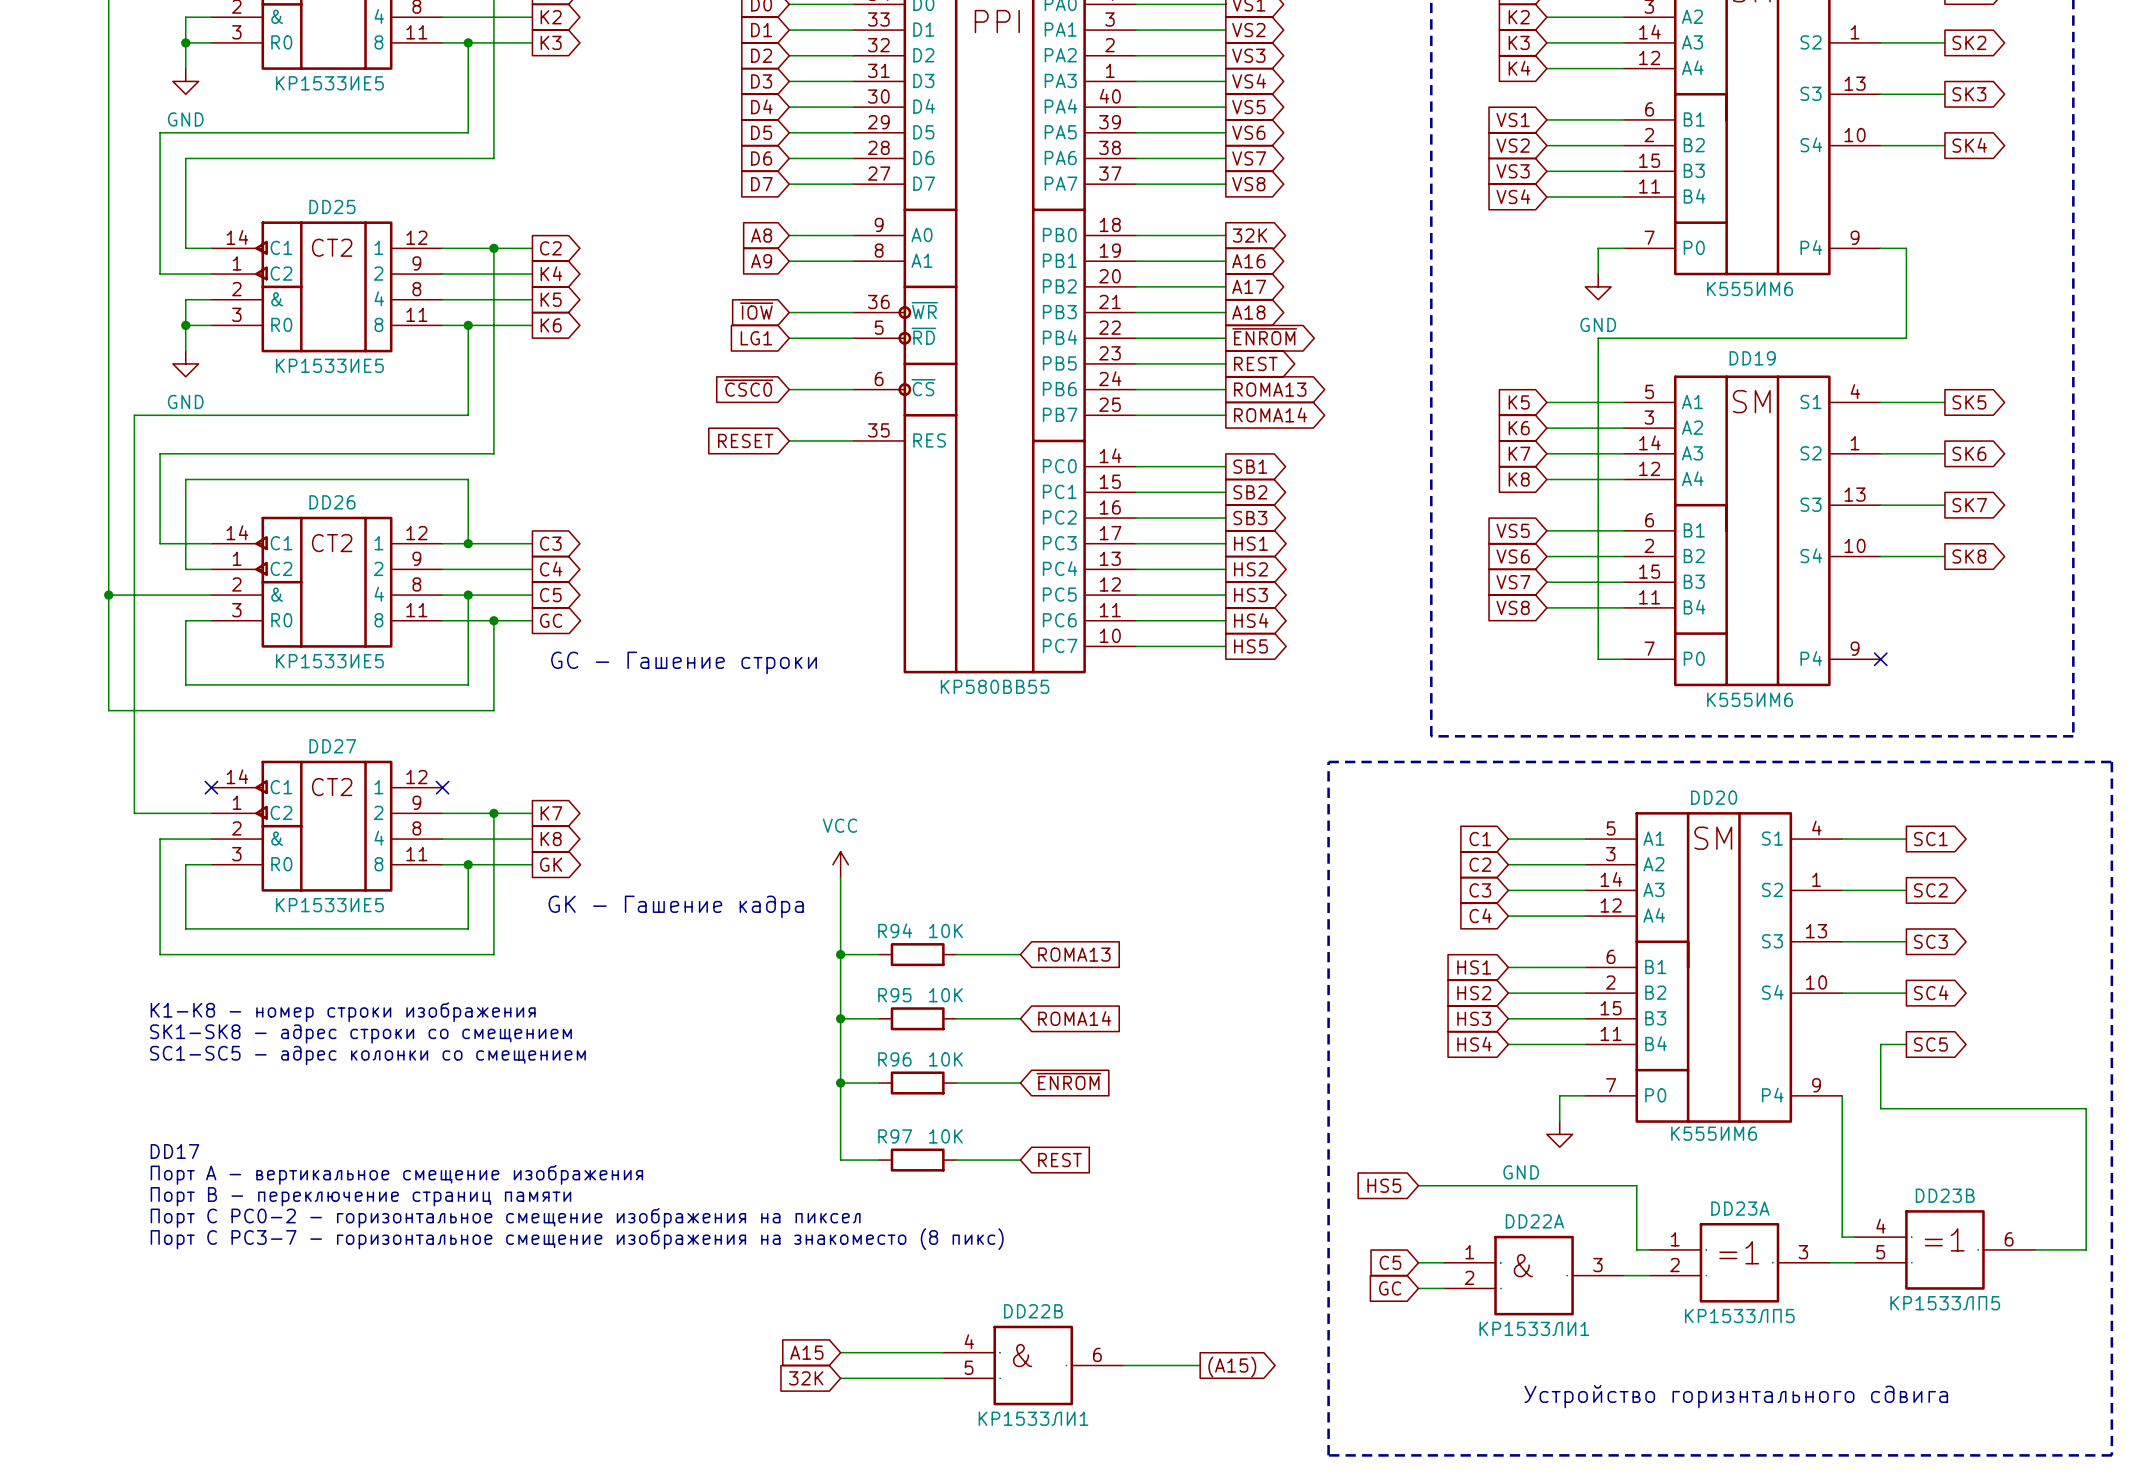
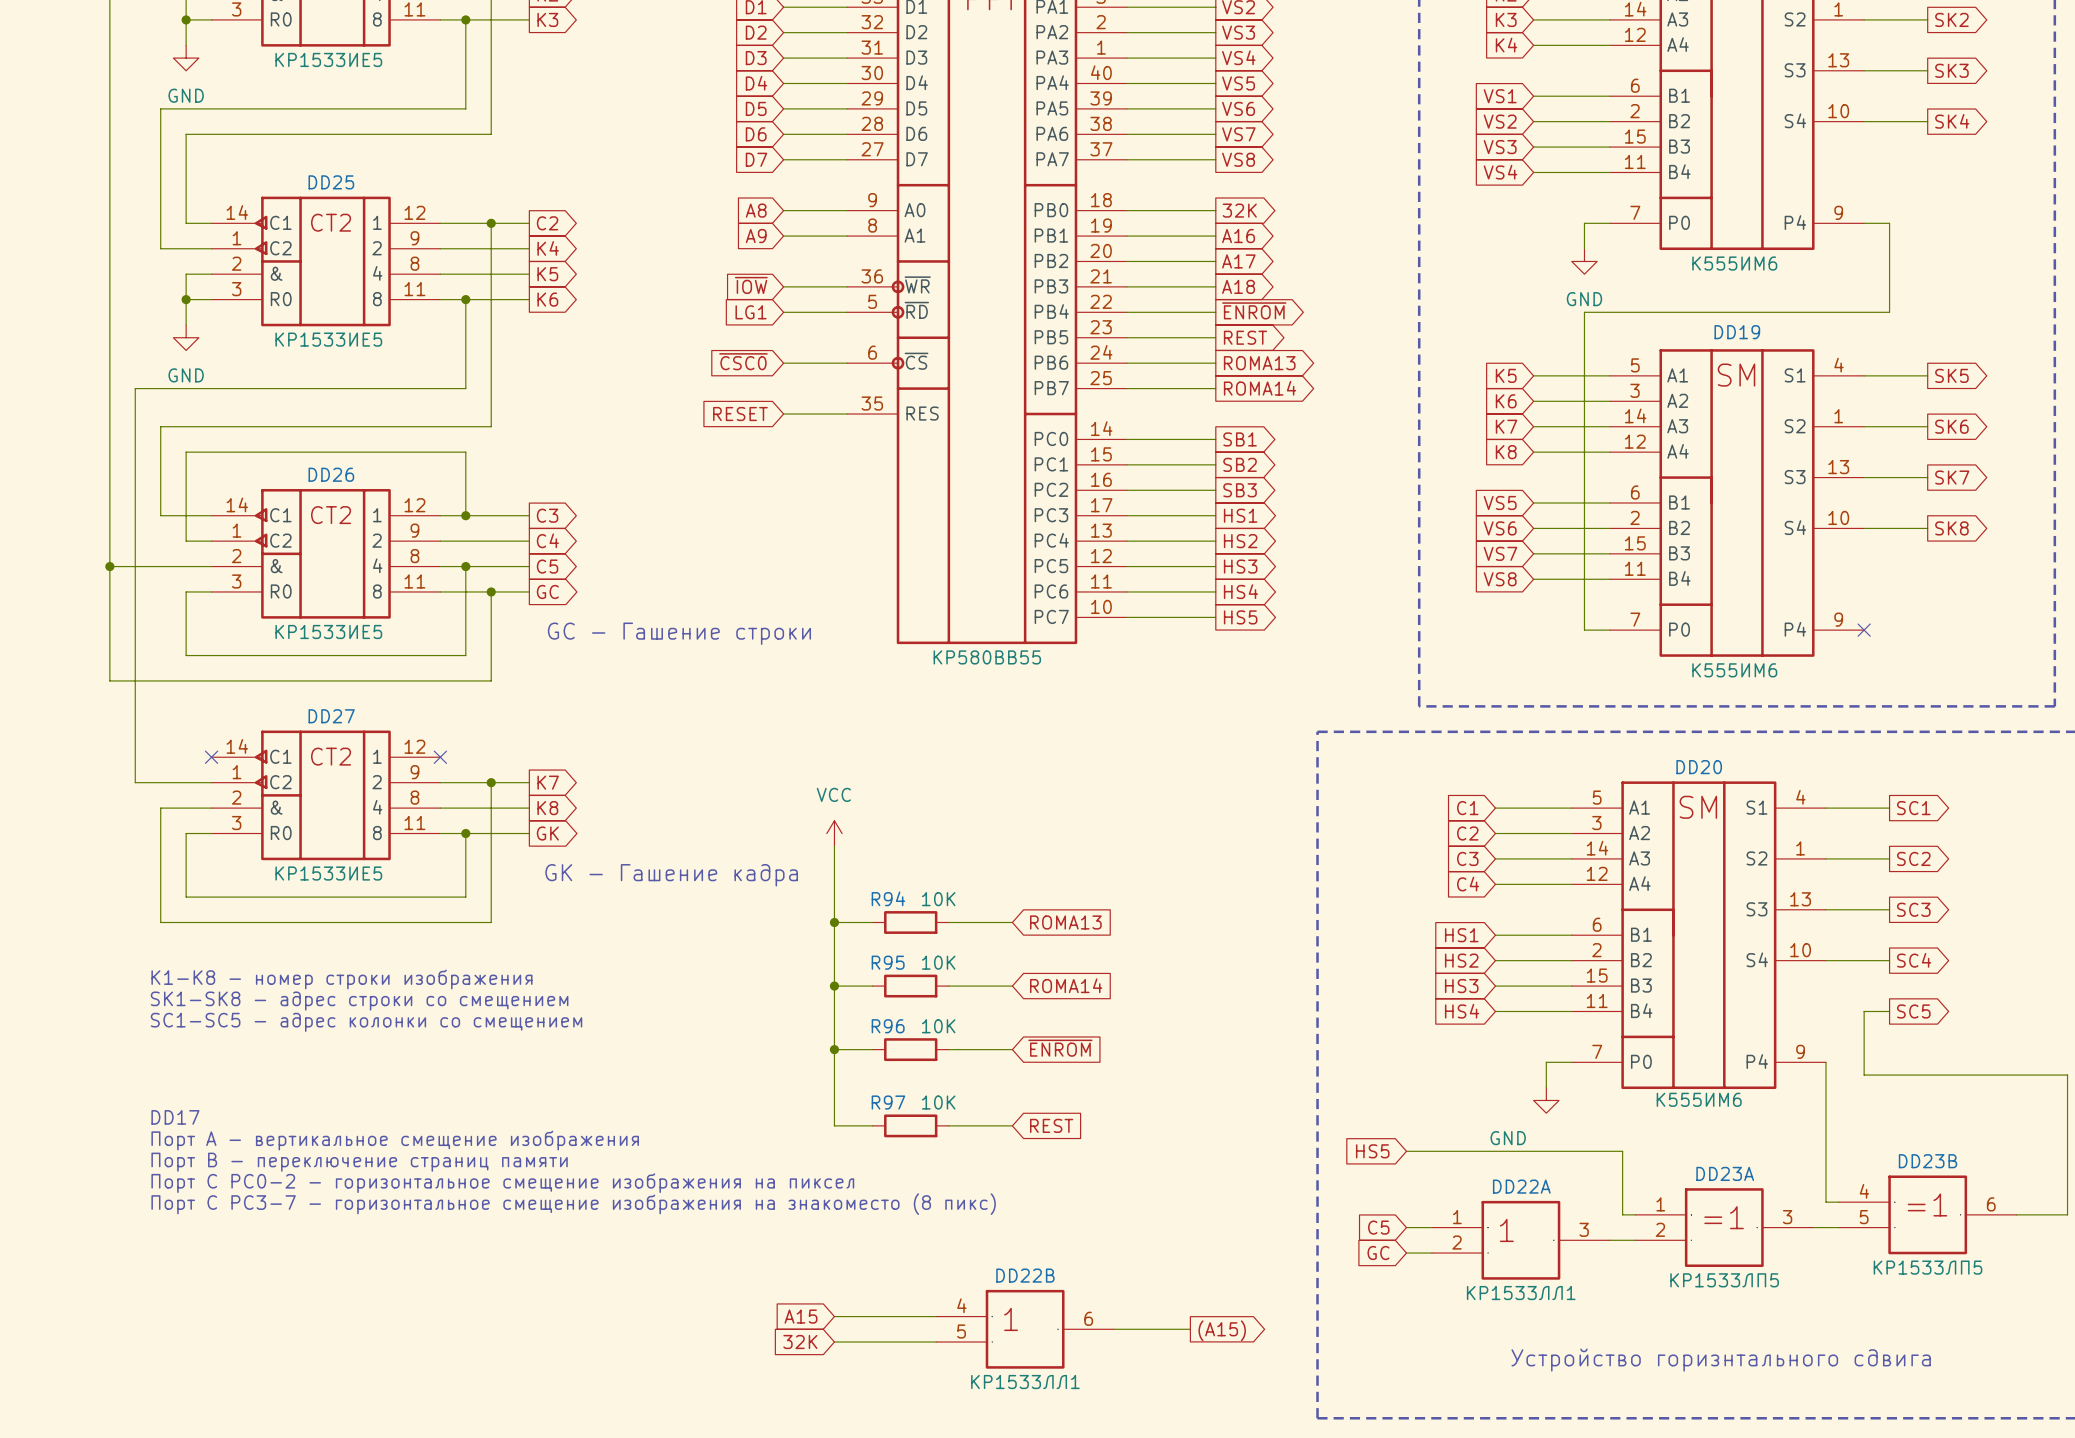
DD22A text: & (1523, 1265) -> 1 (1506, 1230)
DD22A value: КР1533ЛИ1 (1534, 1328) -> КР1533ЛЛ1 (1521, 1293)
DD22B text: & (1022, 1355) -> 1 (1011, 1319)
DD22B value: КР1533ЛИ1 (1033, 1418) -> КР1533ЛЛ1 (1025, 1382)

